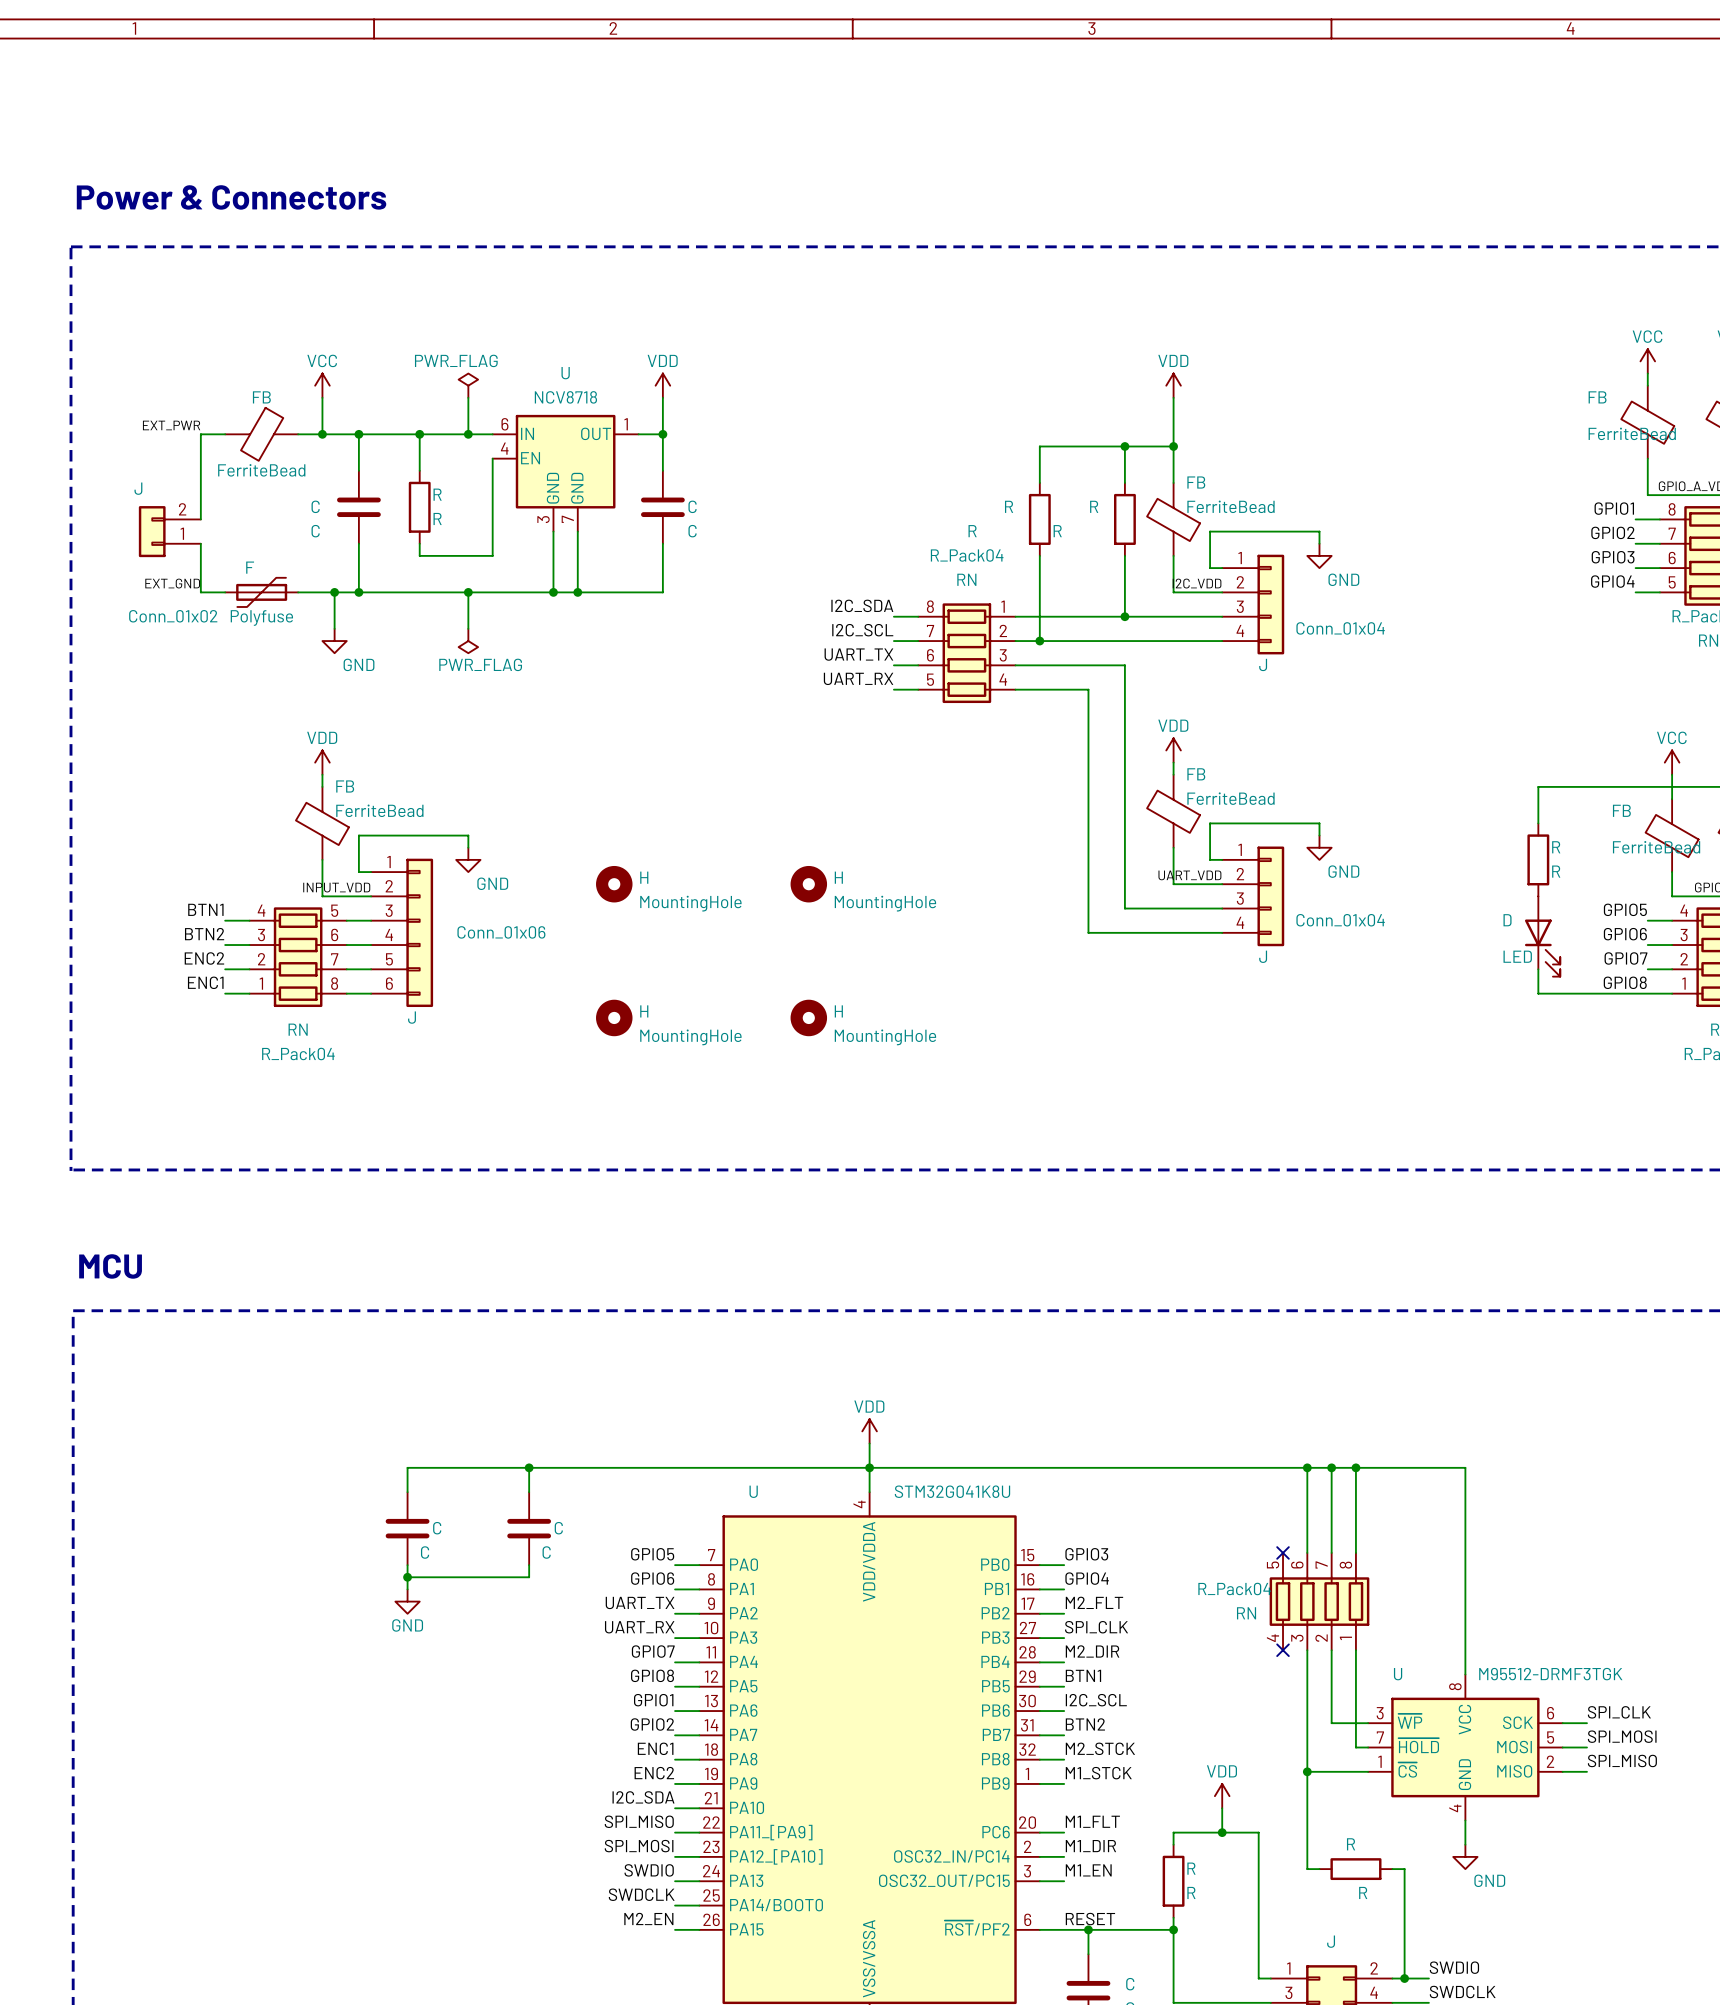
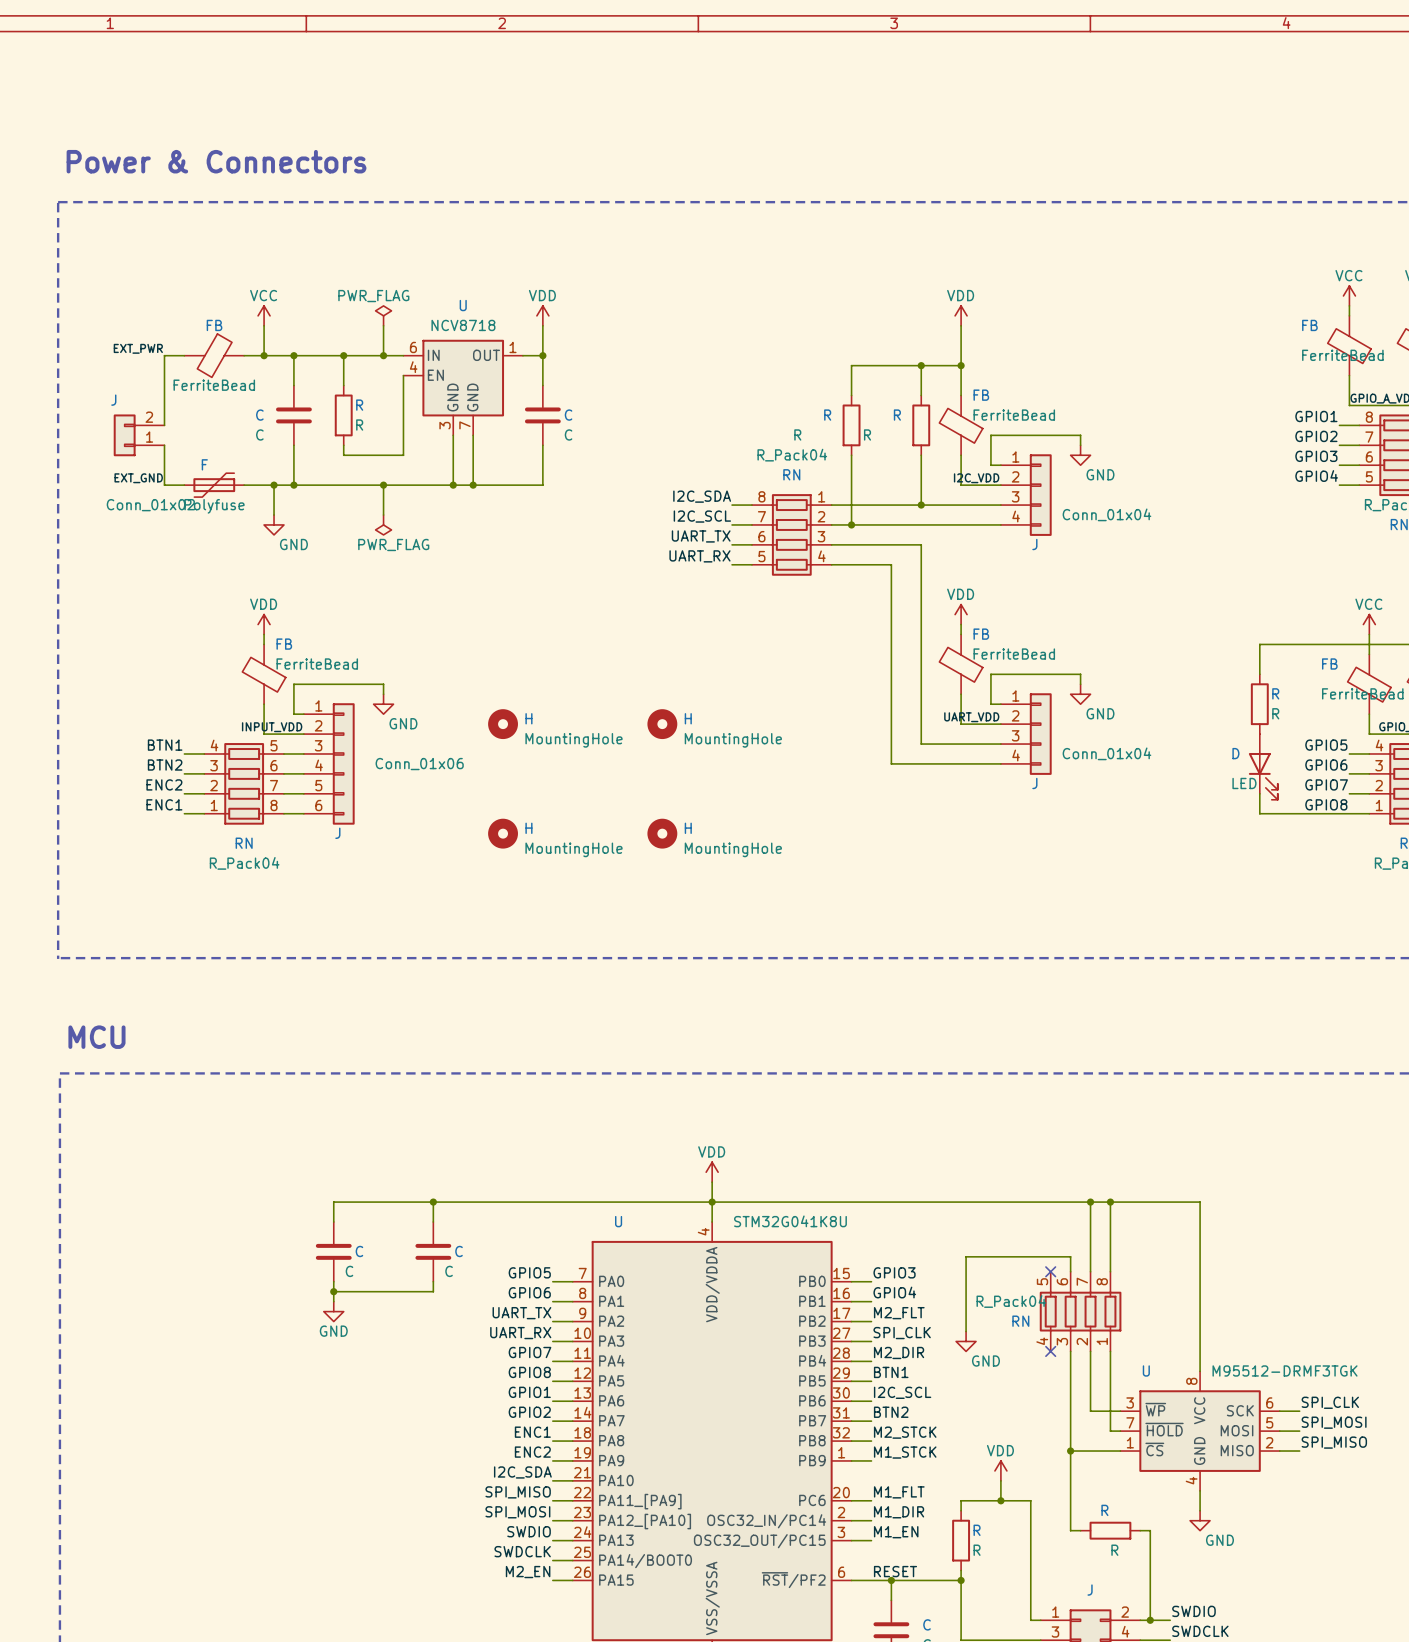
wire: (1307, 1467) (1307, 1534) -> (966, 1331) (966, 1256) (1070, 1256)
junction: (1307, 1467) -> none
power symbol: none -> GND (966, 1341)

